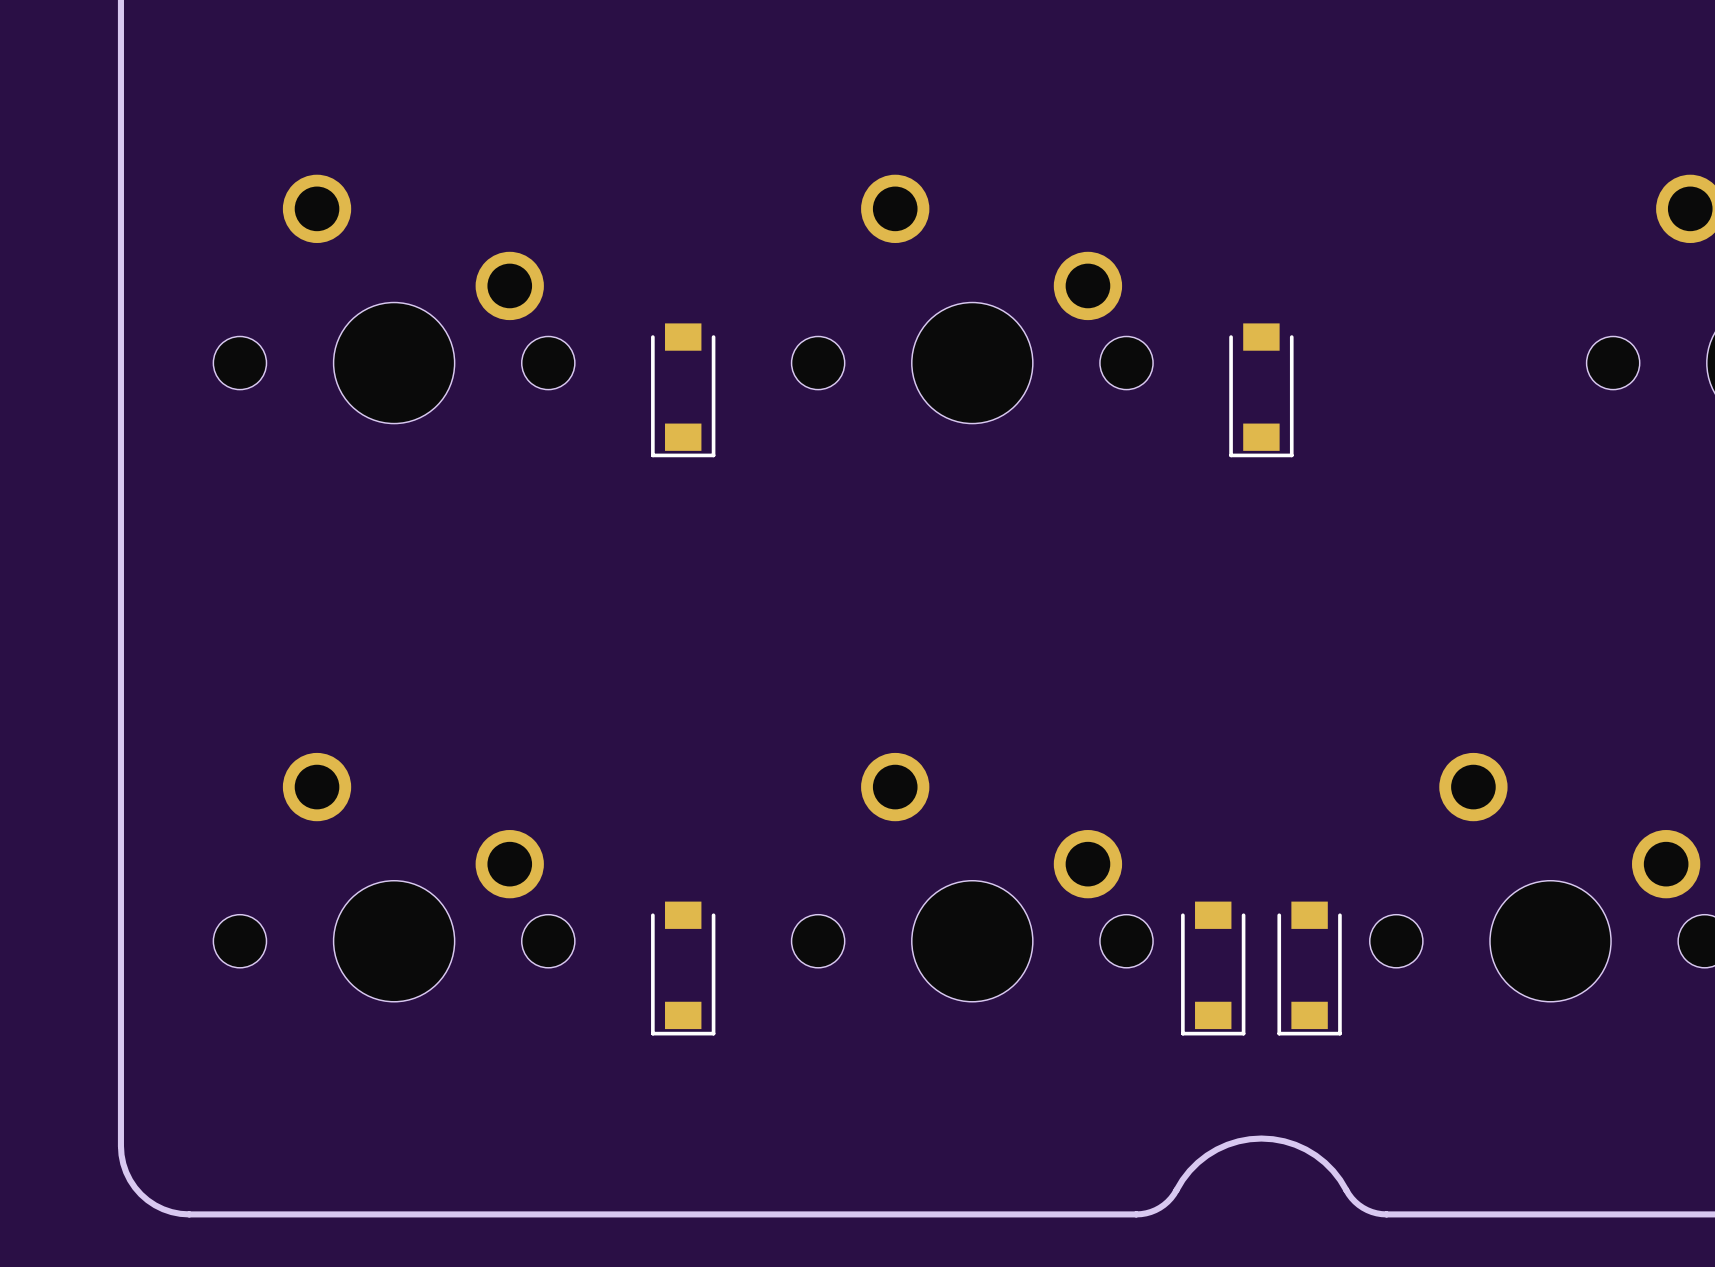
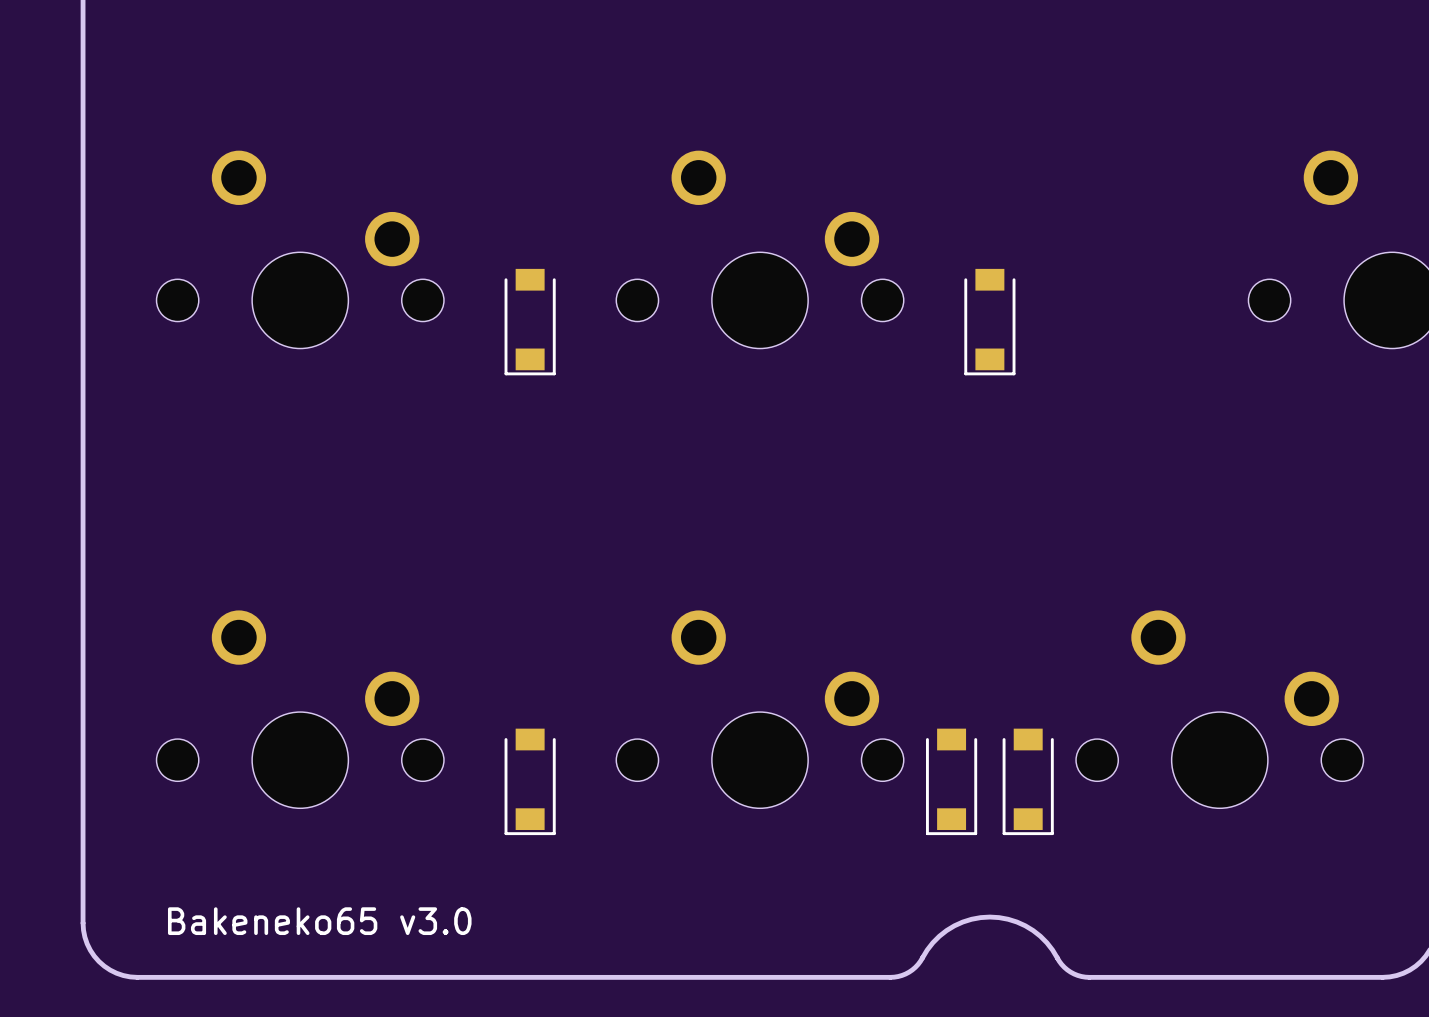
text: none -> Bakeneko65 v3.0 (319, 921)

